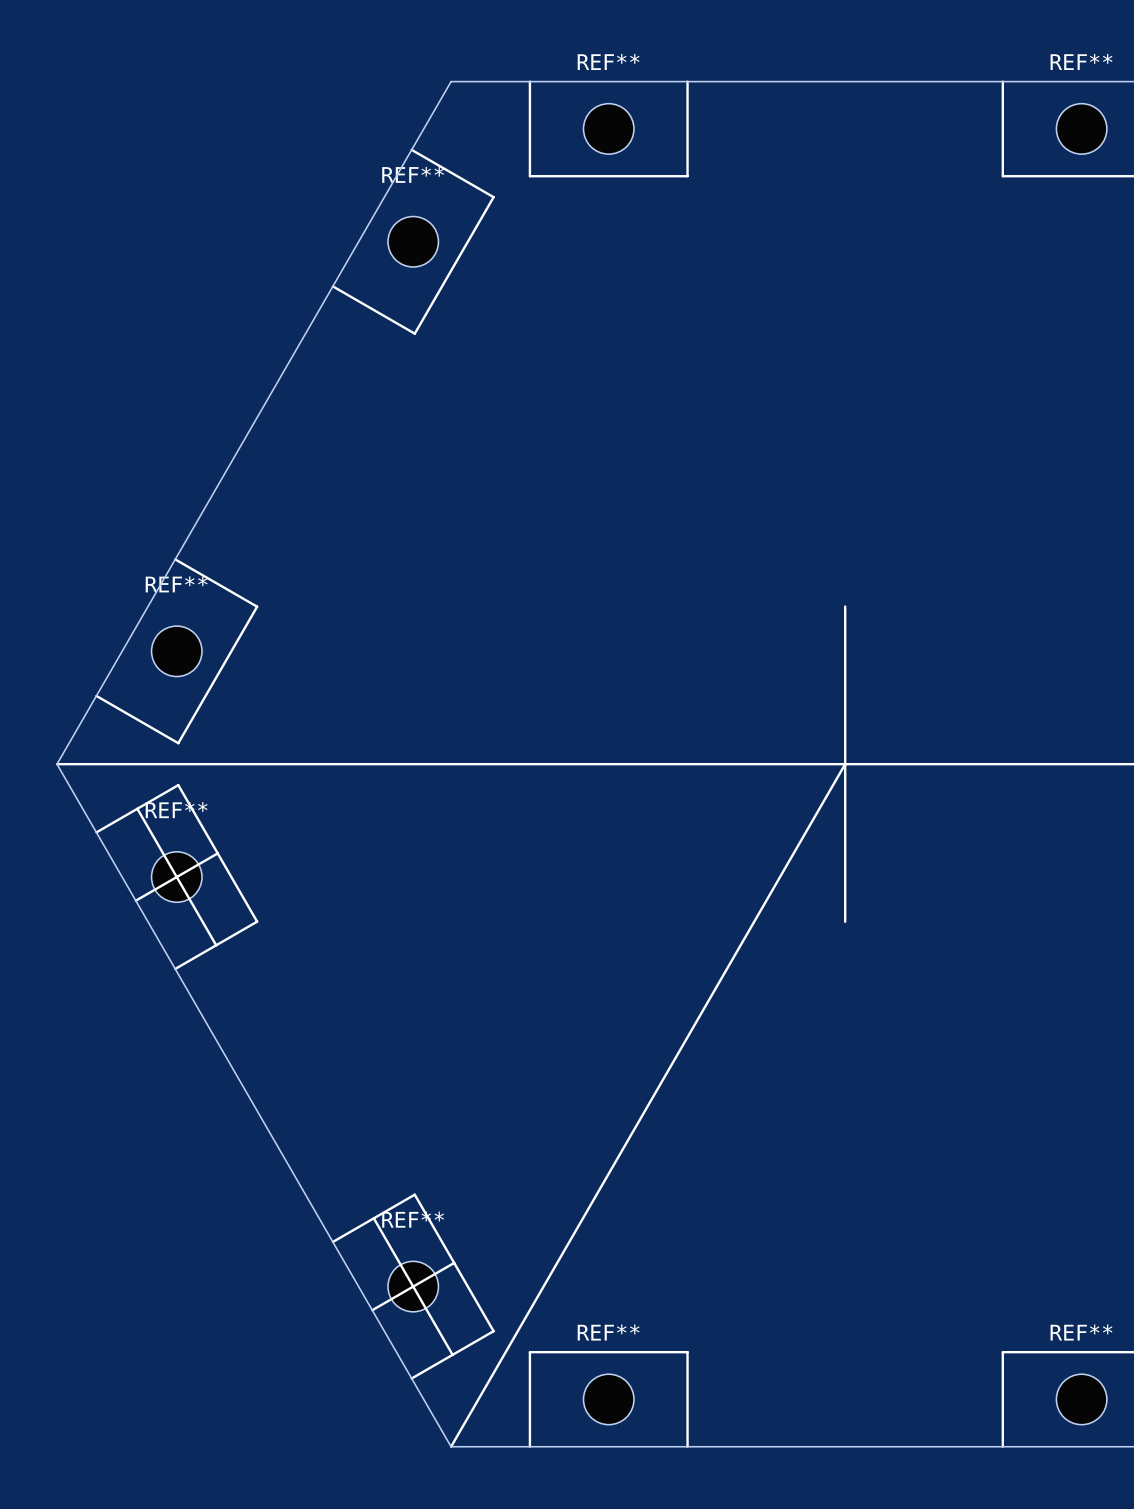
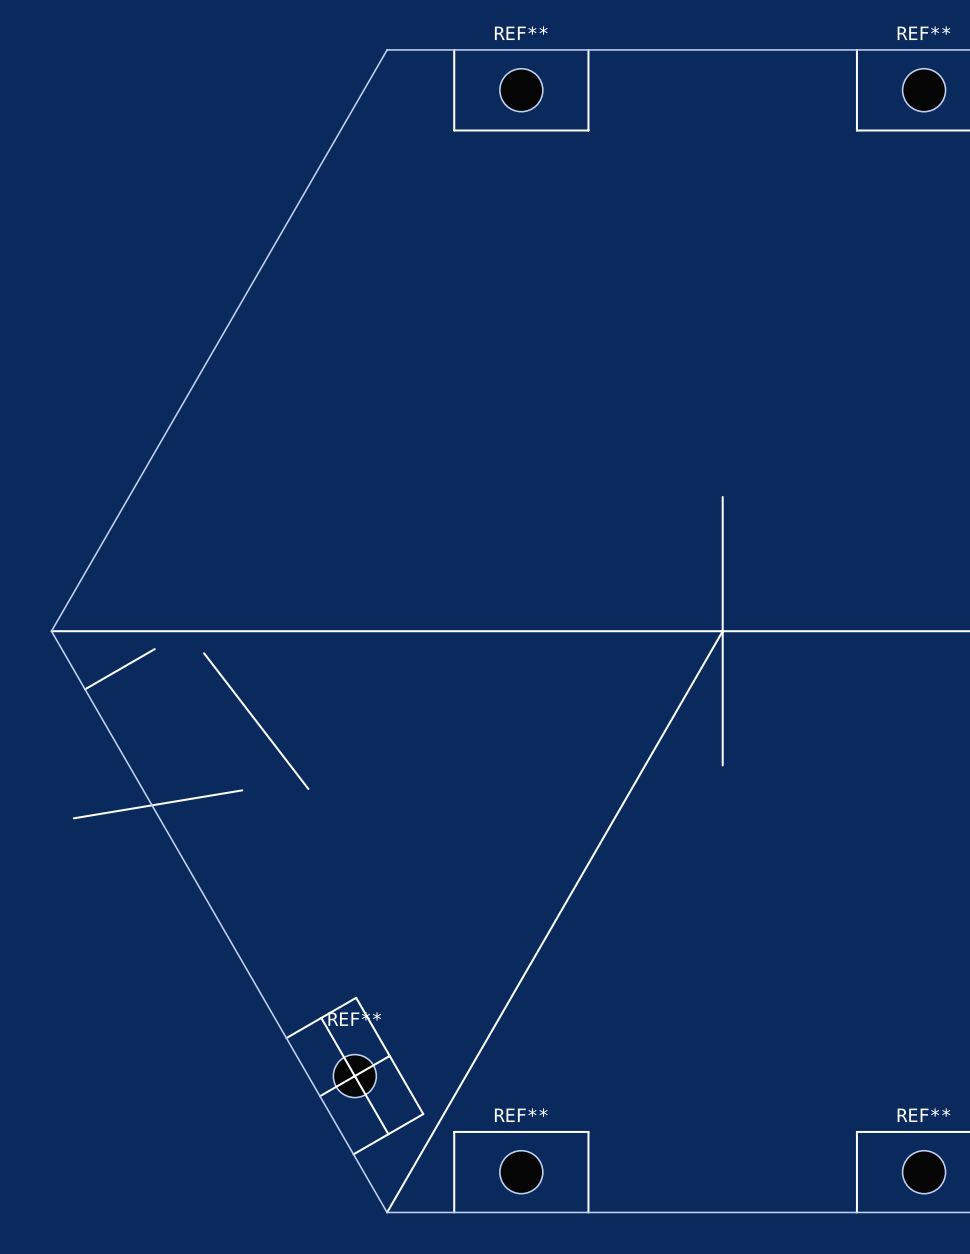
line: (411, 149) (493, 197) (414, 333) (332, 286) -> none
REF**: (413, 241) -> none
line: (175, 559) (257, 606) (178, 743) (96, 695) -> none
REF**: (176, 651) -> none
line: (178, 785) (257, 921) (175, 968) -> none
line: none -> (204, 653) (308, 789)
line: (137, 808) (216, 945) -> none
line: (217, 853) (135, 900) -> none
REF**: (176, 877) -> none
line: none -> (242, 790) (73, 818)

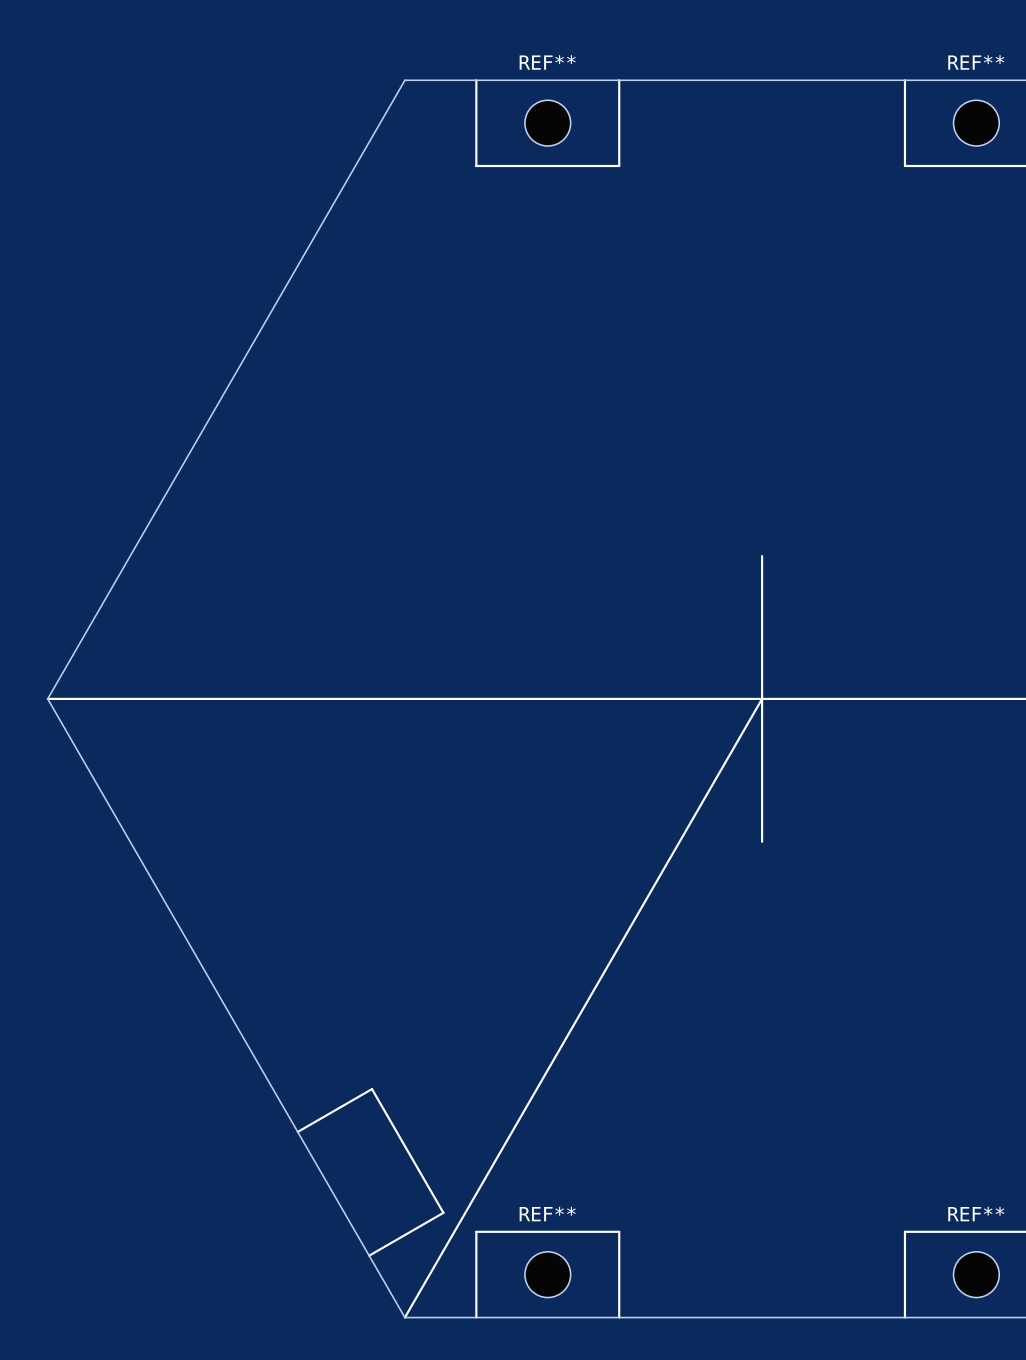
line: (154, 649) (85, 689) -> none
line: (204, 653) (308, 789) -> none
line: (242, 790) (73, 818) -> none
line: (321, 1017) (388, 1134) -> none
line: (389, 1055) (319, 1096) -> none
REF**: (354, 1076) -> none

